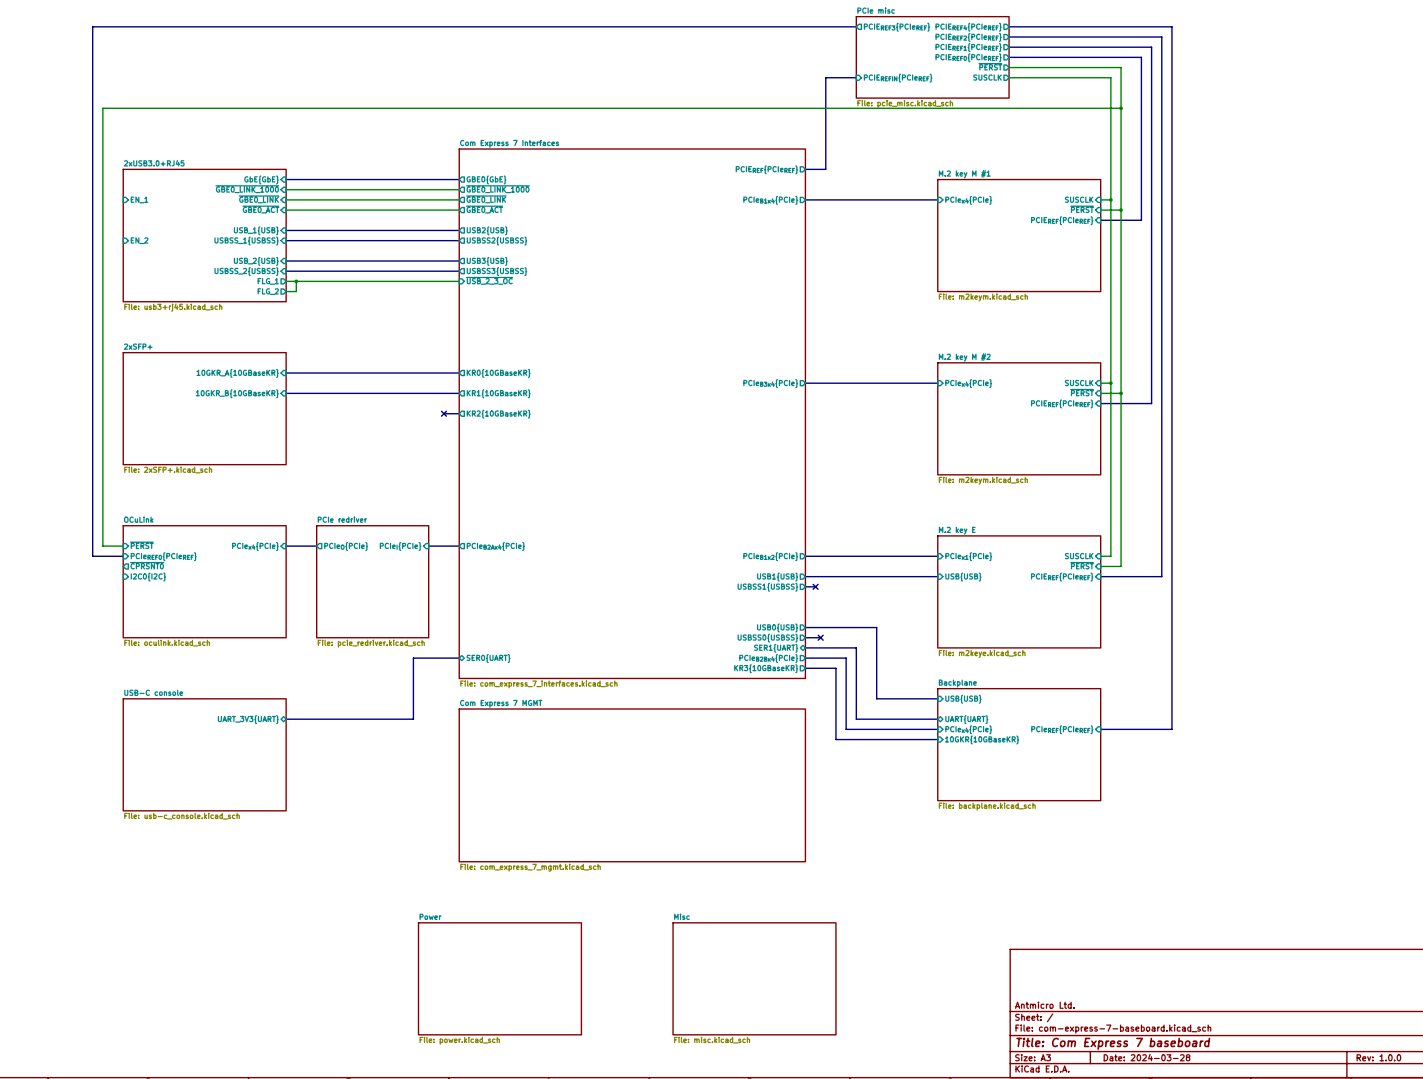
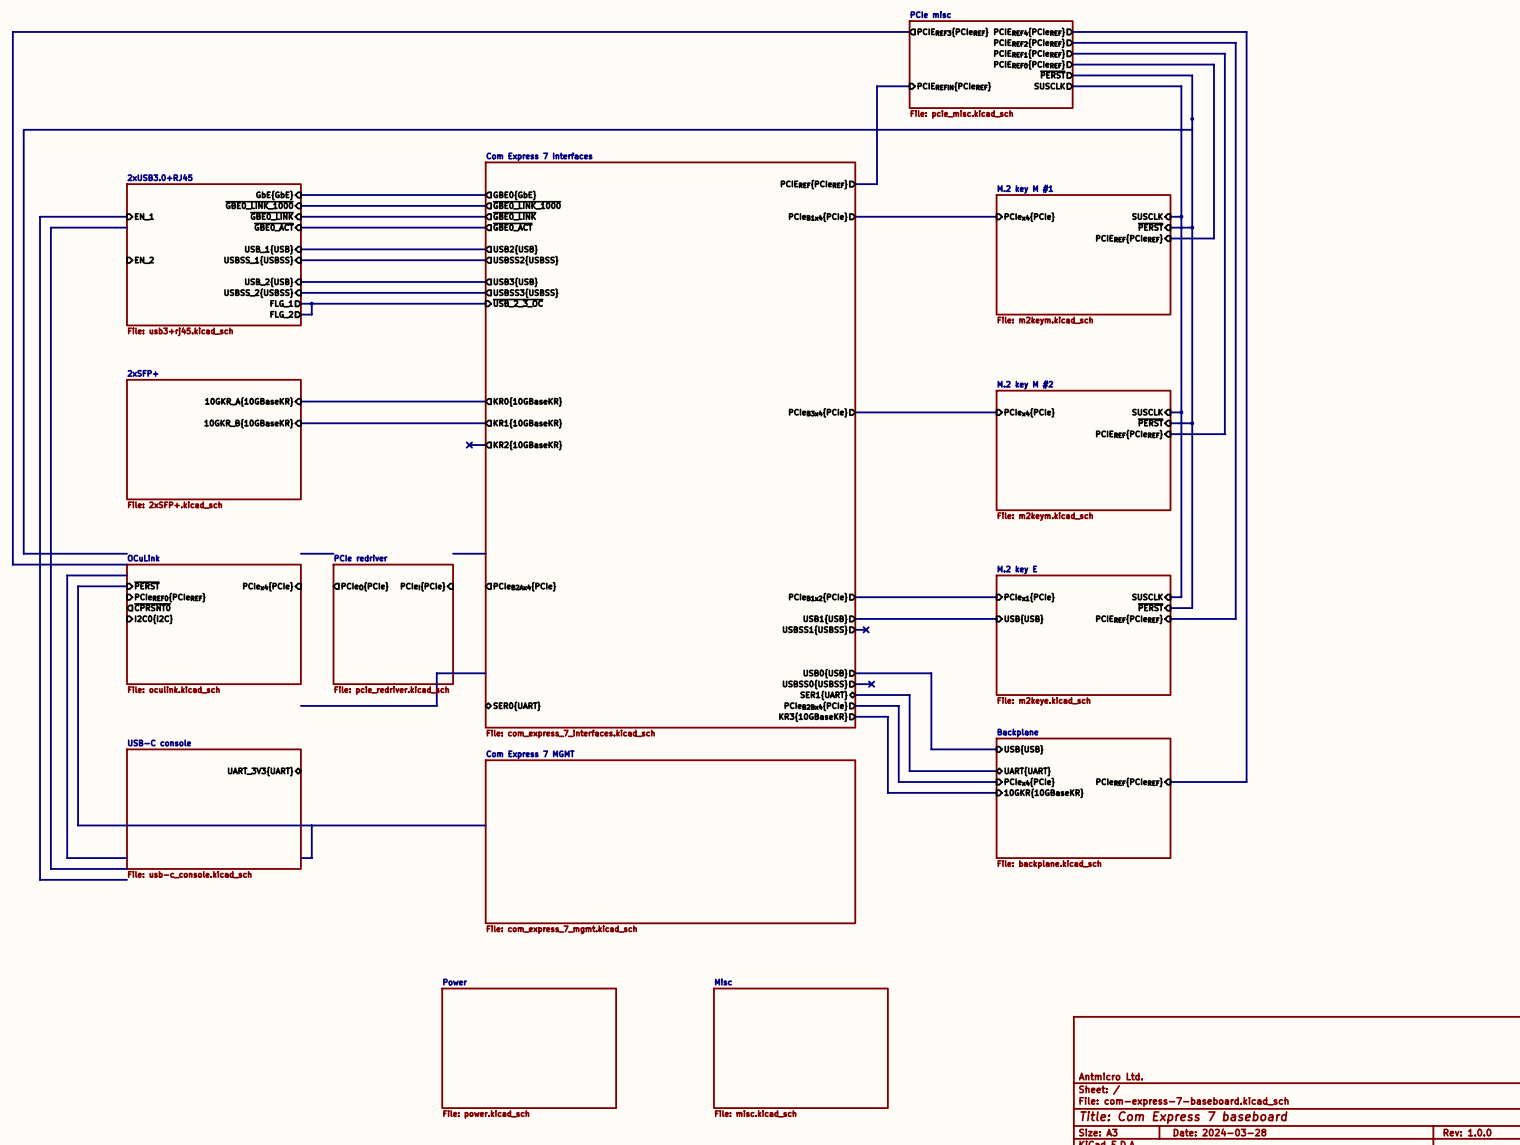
bus: (92, 26) (92, 556) (123, 556) -> (94, 31) (12, 31) (12, 564) (126, 564)
wire: (1121, 108) (102, 108) (102, 546) (123, 546) -> none
wire: none -> (1192, 129) (23, 129) (23, 553) (126, 553)
wire: none -> (126, 216) (40, 216) (40, 879) (126, 879)
wire: none -> (126, 227) (50, 227) (50, 868) (126, 868)
wire: none -> (126, 575) (67, 575) (67, 858) (126, 858)
bus: none -> (126, 586) (78, 586) (78, 825) (485, 825)
bus: (286, 546) (316, 546) -> (300, 553) (333, 553)
bus: (428, 546) (459, 546) -> (453, 553) (485, 553)
bus: none -> (485, 673) (436, 673) (436, 705) (300, 705)
bus: (459, 658) (413, 658) (413, 719) (286, 719) -> none
bus: none -> (311, 825) (311, 858) (300, 858)

